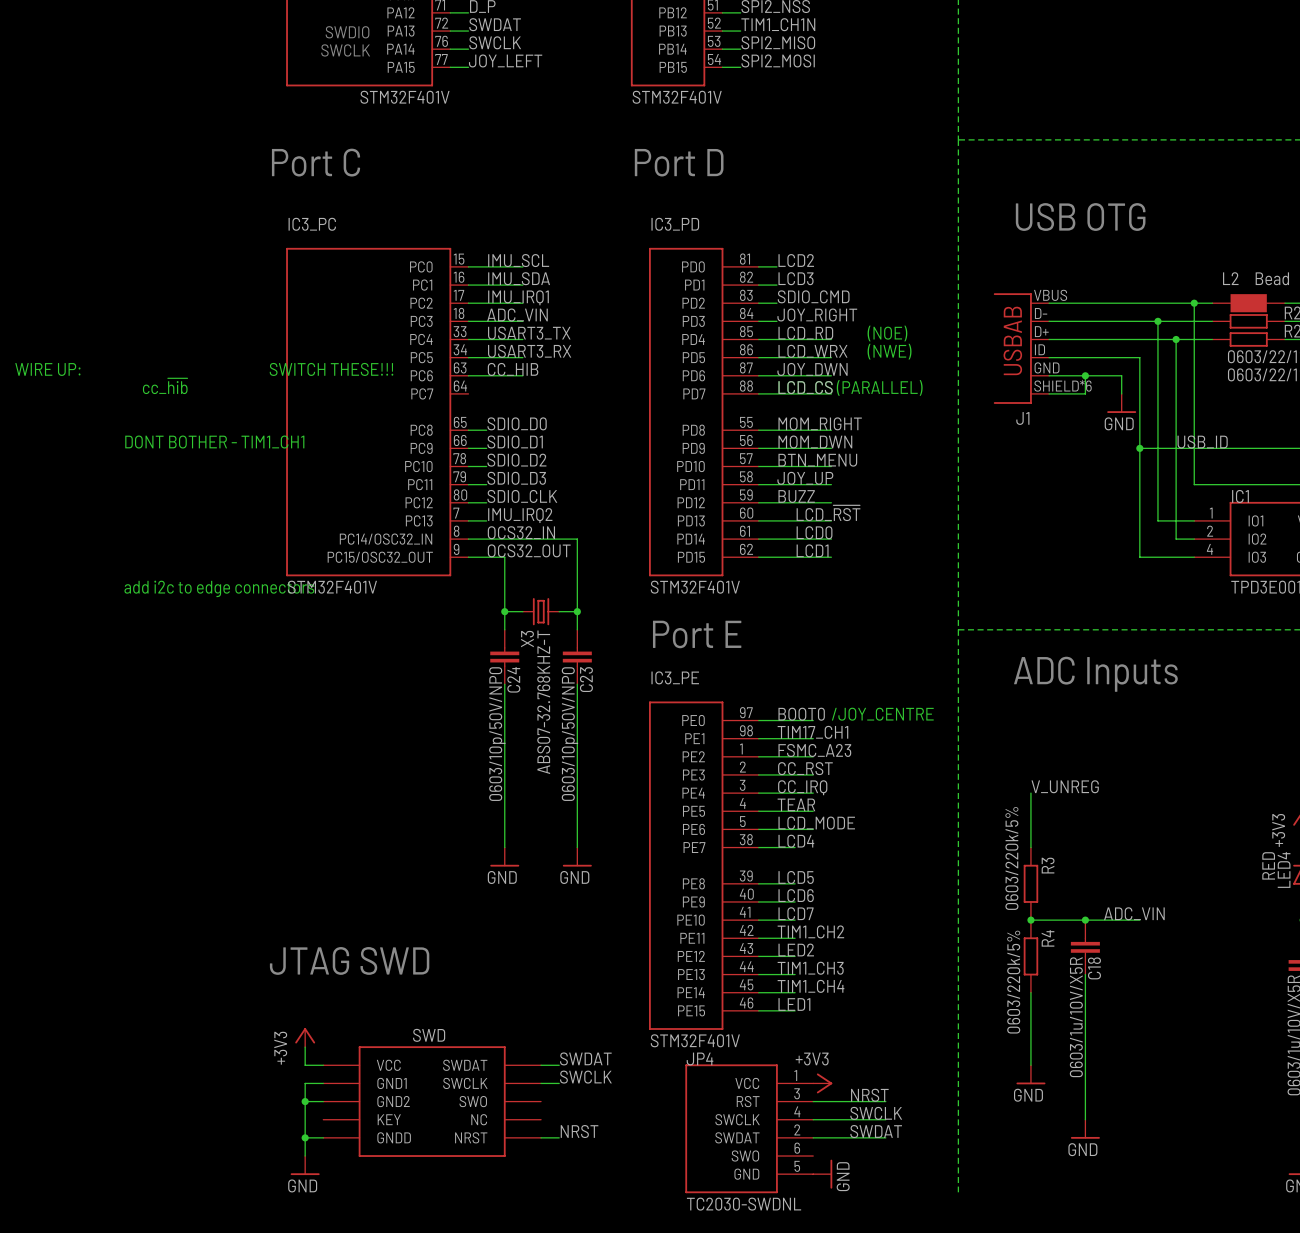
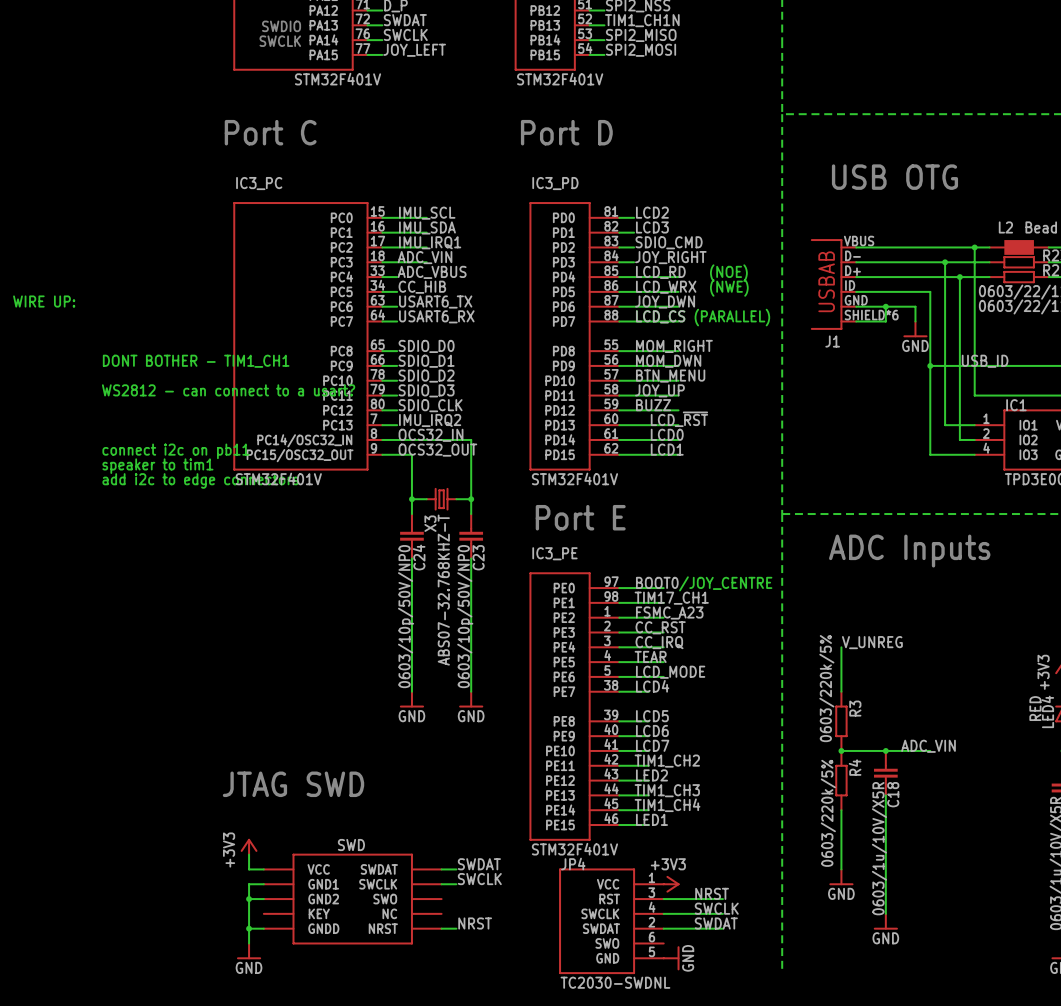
label: USART3_TX (529, 333) -> ADC_VBUS (432, 272)
wire: (486, 339) (522, 339) -> none
label: USART3_RX (529, 351) -> CC_HIB (422, 287)
wire: (486, 357) (522, 357) -> none
text: SWITCH THESE!!! (331, 369) -> none
label: CC_HIB (513, 369) -> USART6_TX (435, 302)
wire: (486, 375) (522, 375) -> none
text: cc_~{hib} (165, 386) -> none
label: none -> USART6_RX (436, 316)
wire: none -> (382, 321) (397, 321)
text: none -> WS2812 - can connect to a usart? (228, 390)
text: none -> connect i2c on pb11 (175, 451)
text: none -> speaker to tim1 (157, 466)

